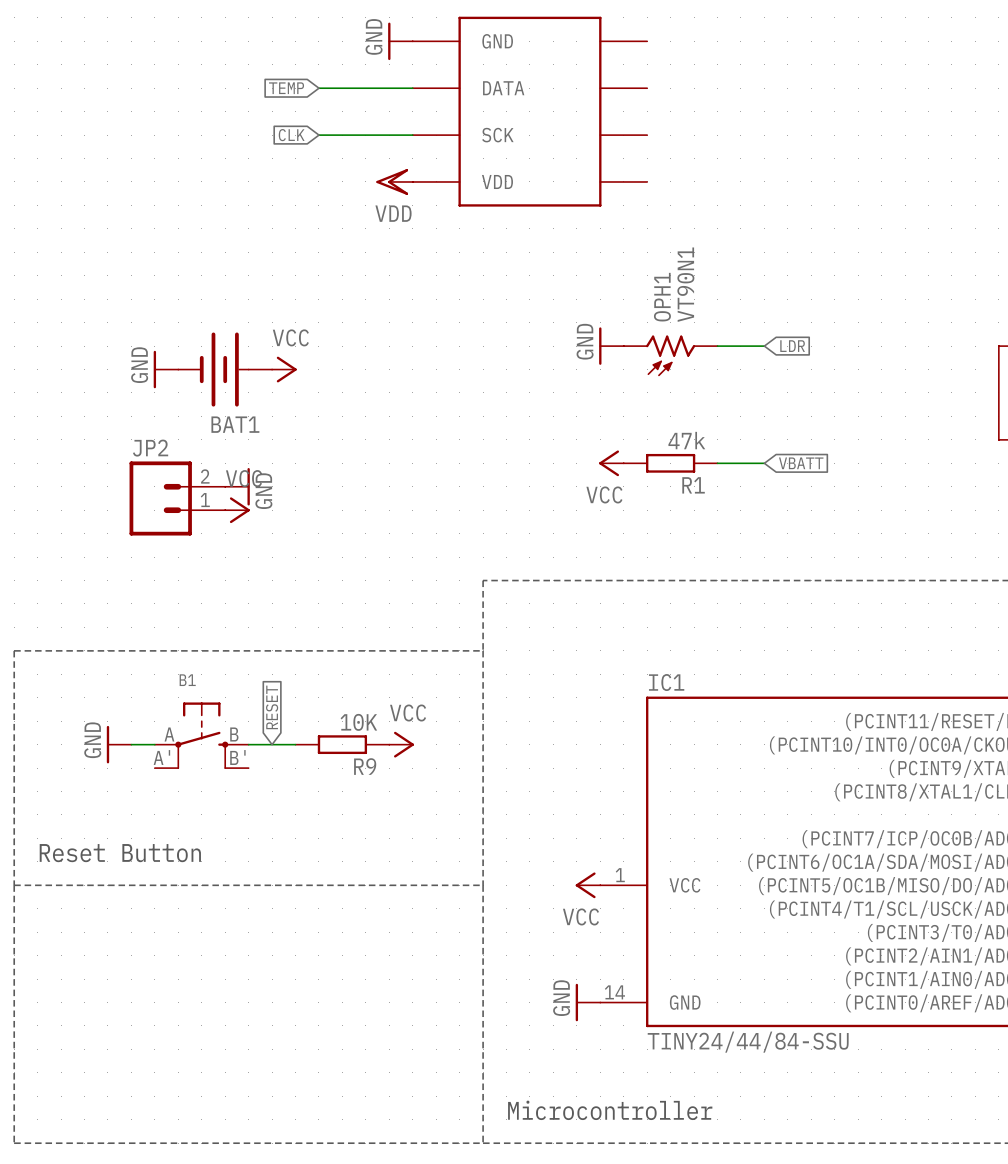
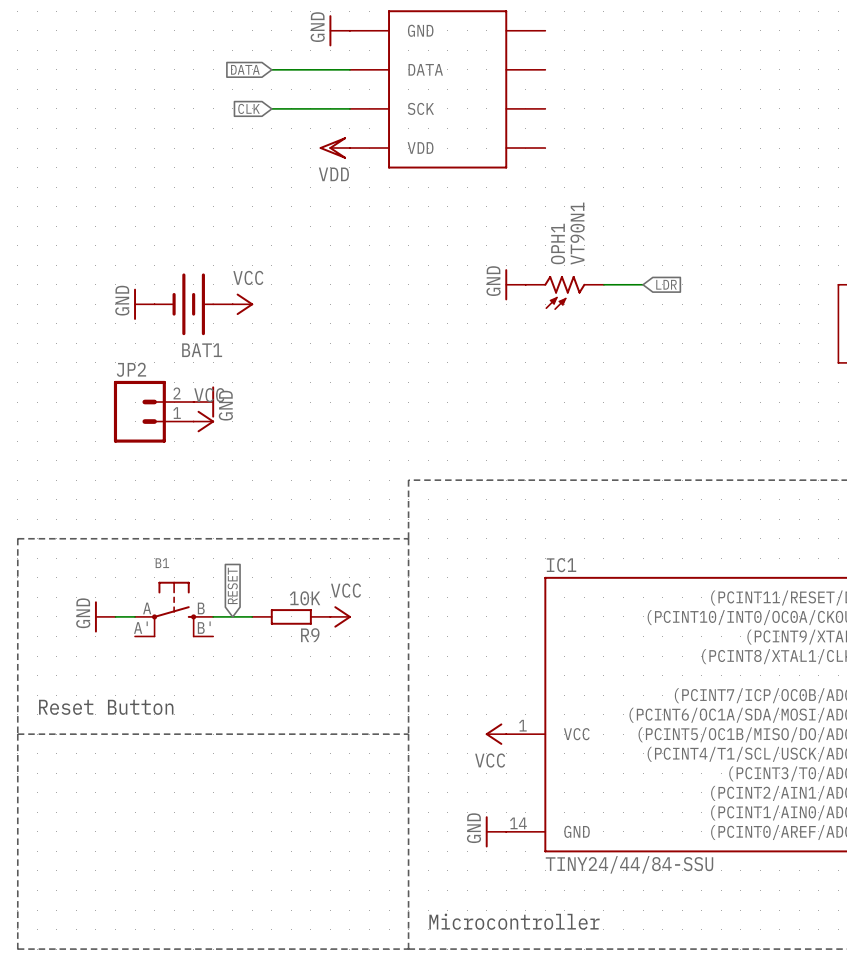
global label: TEMP (286, 88) -> DATA (245, 69)
power symbol: VCC (611, 463) -> none
R1: 47k (670, 463) -> none
wire: (717, 463) (764, 463) -> none
global label: VBATT (801, 463) -> none

